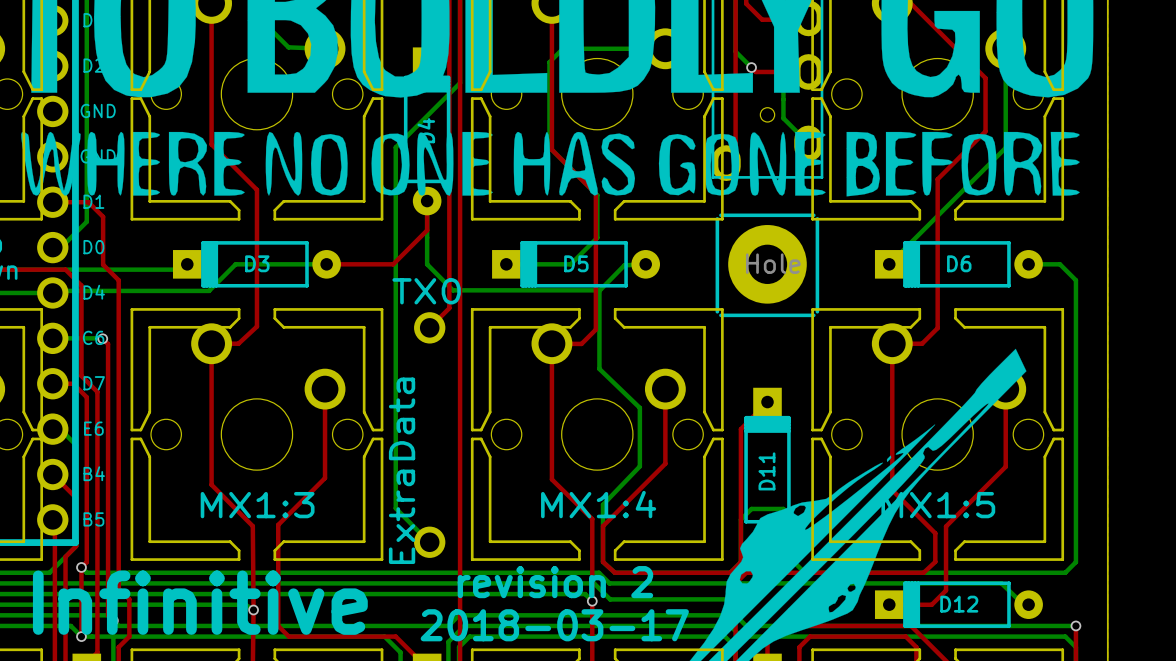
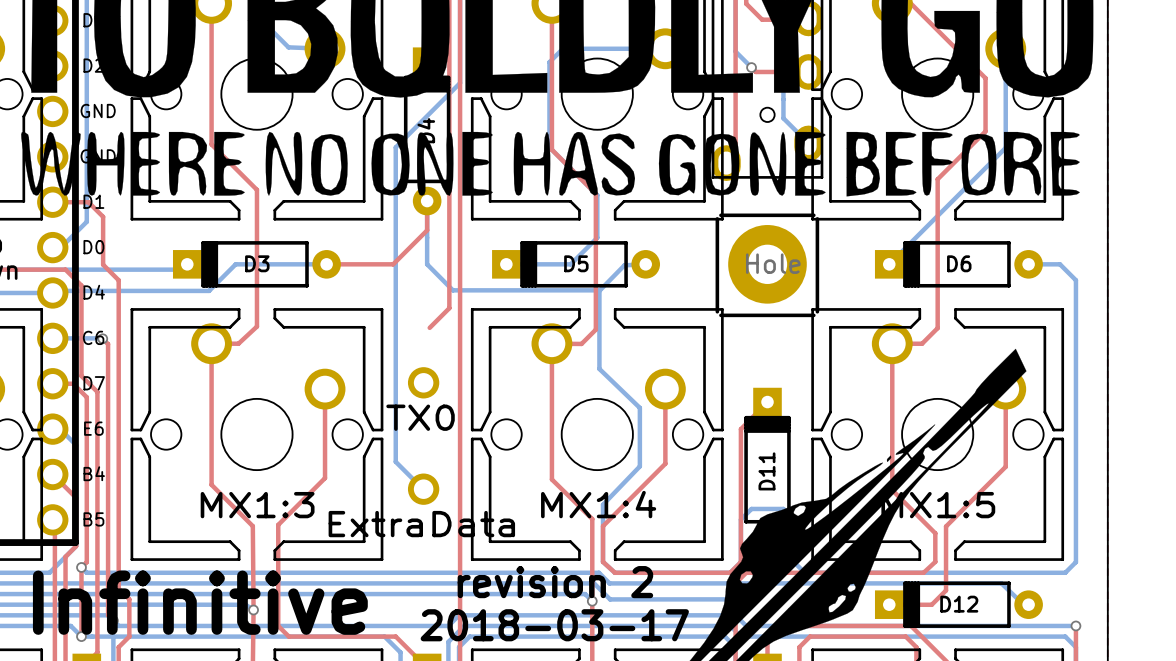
part value position: TX0 (426, 291) -> TX0 (420, 417)
part position: (429, 327) -> (423, 382)
bottom track: (395, 461) (395, 508) (429, 542) -> (395, 461) (423, 489)
part value rotation: 0° (402, 470) -> 90° clockwise (421, 524)
part position: (429, 542) -> (423, 489)

